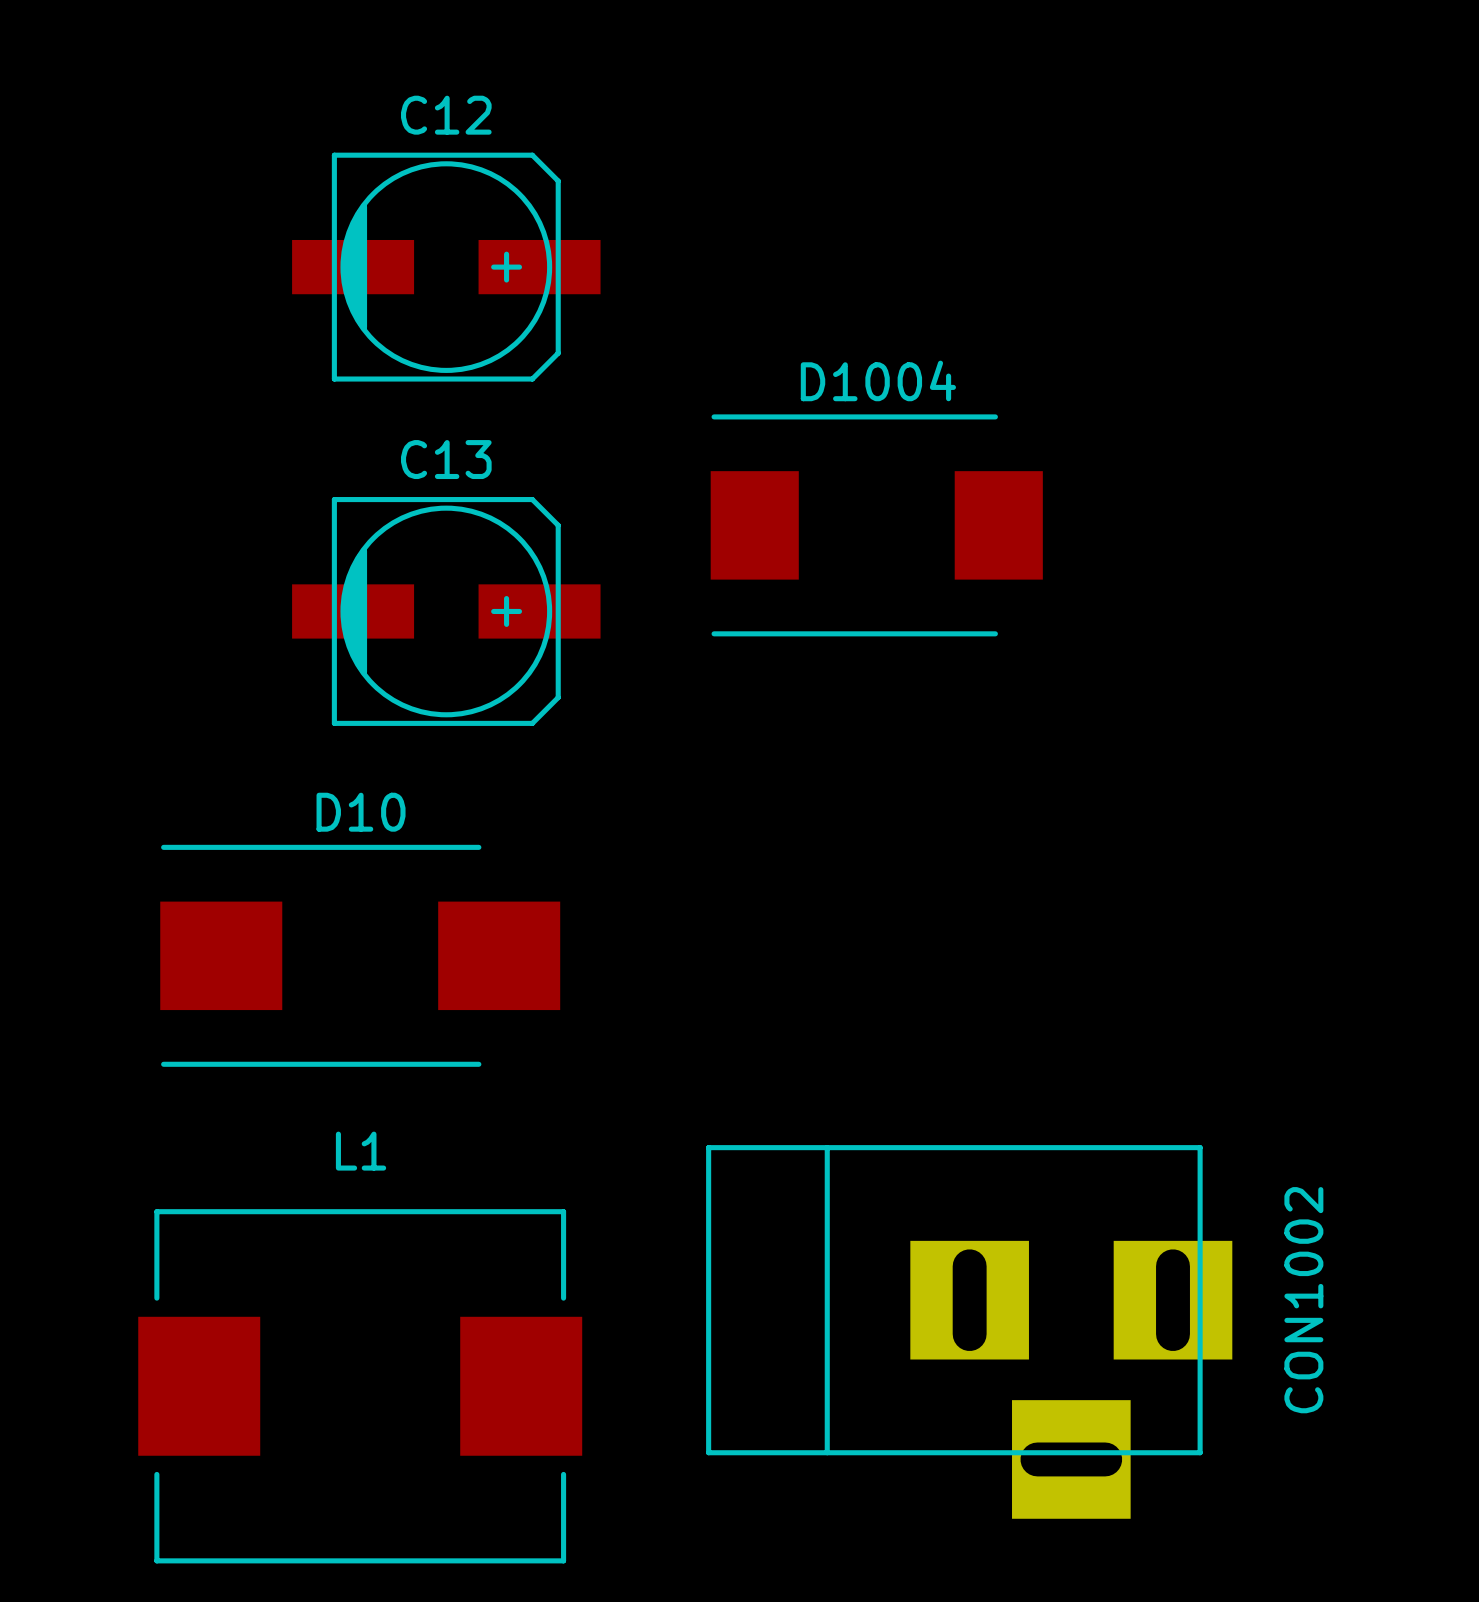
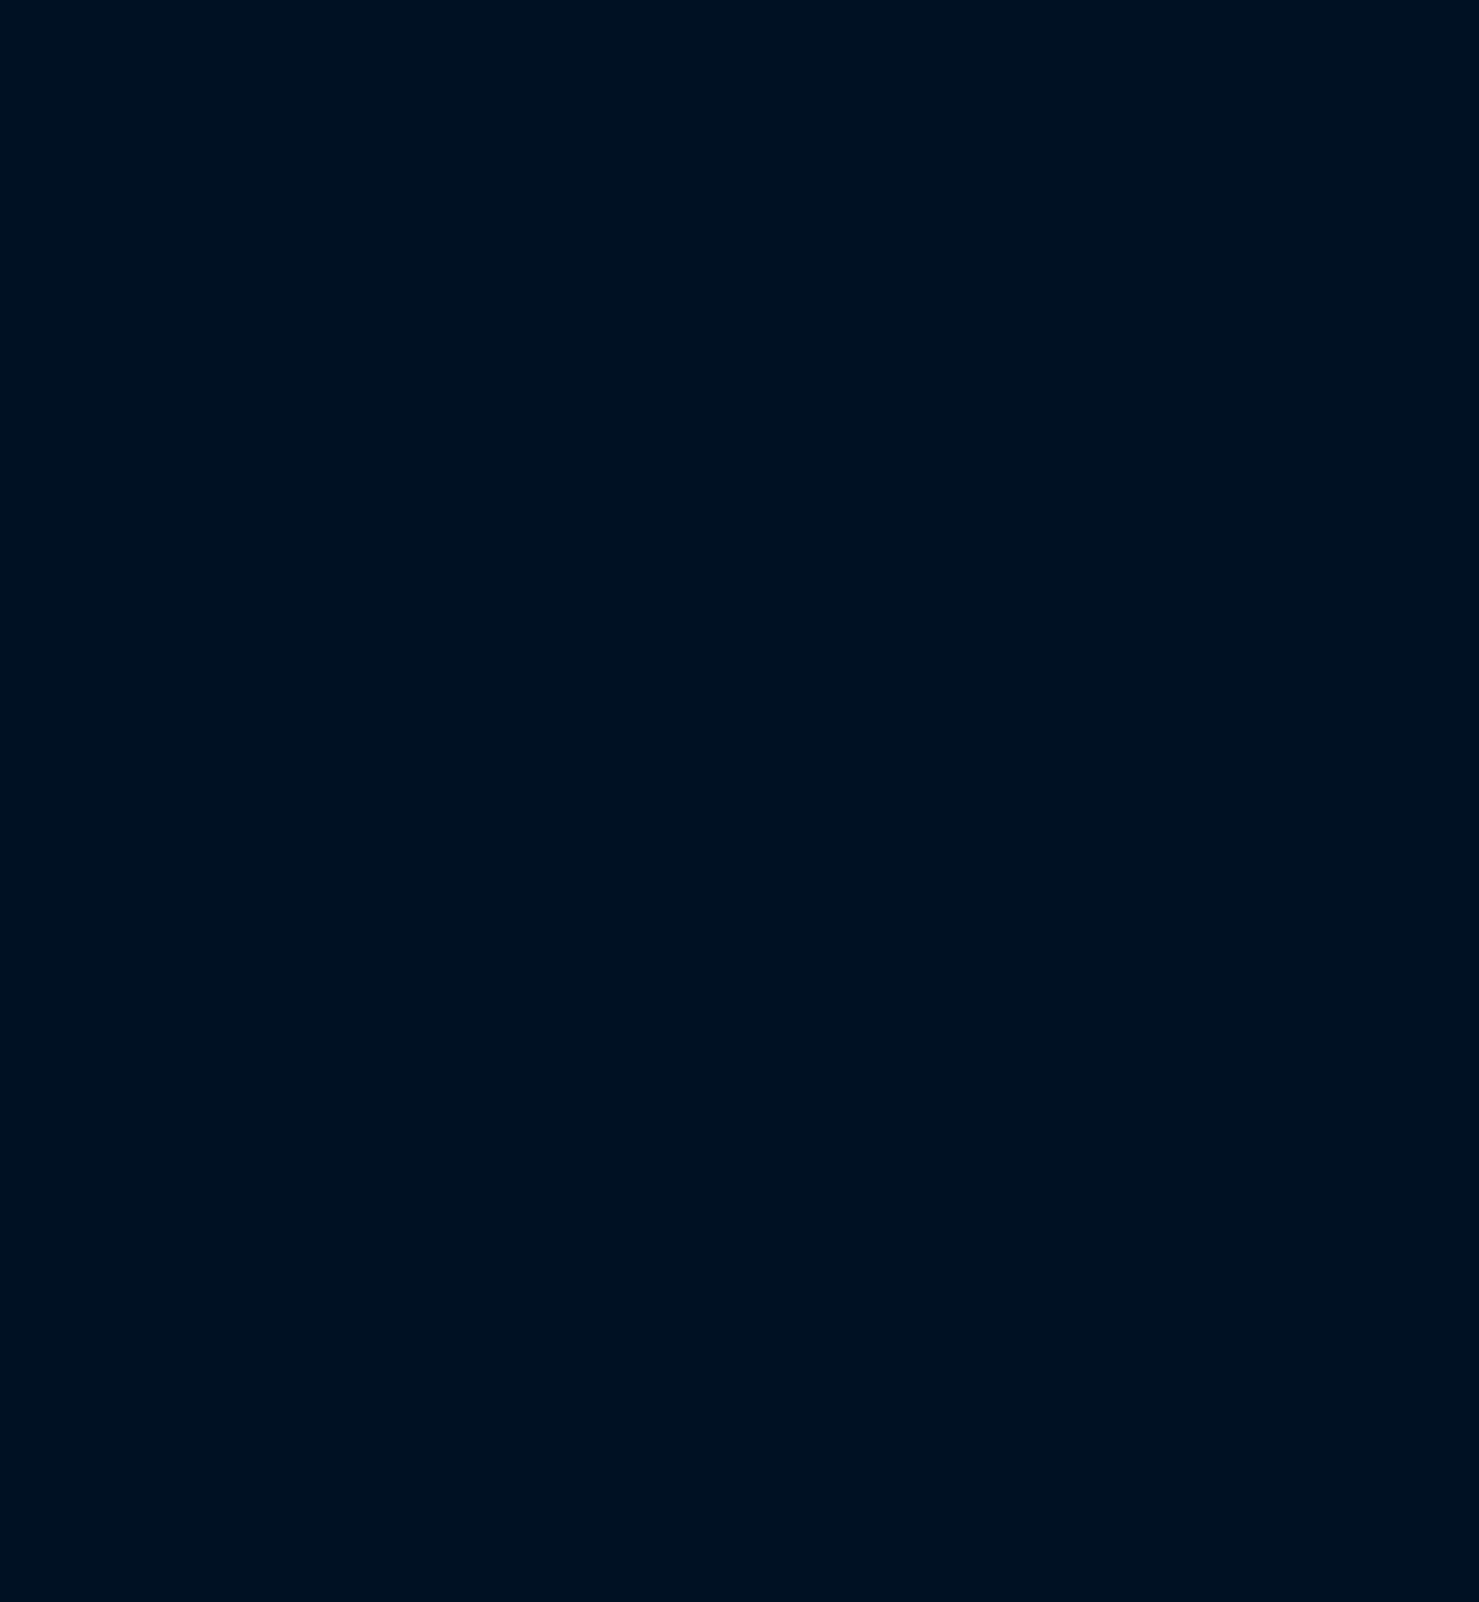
C12: (446, 267) -> none
D1004: (876, 525) -> none
C13: (446, 611) -> none
D10: (360, 955) -> none
CON1002: (969, 1331) -> none
L1: (360, 1386) -> none

